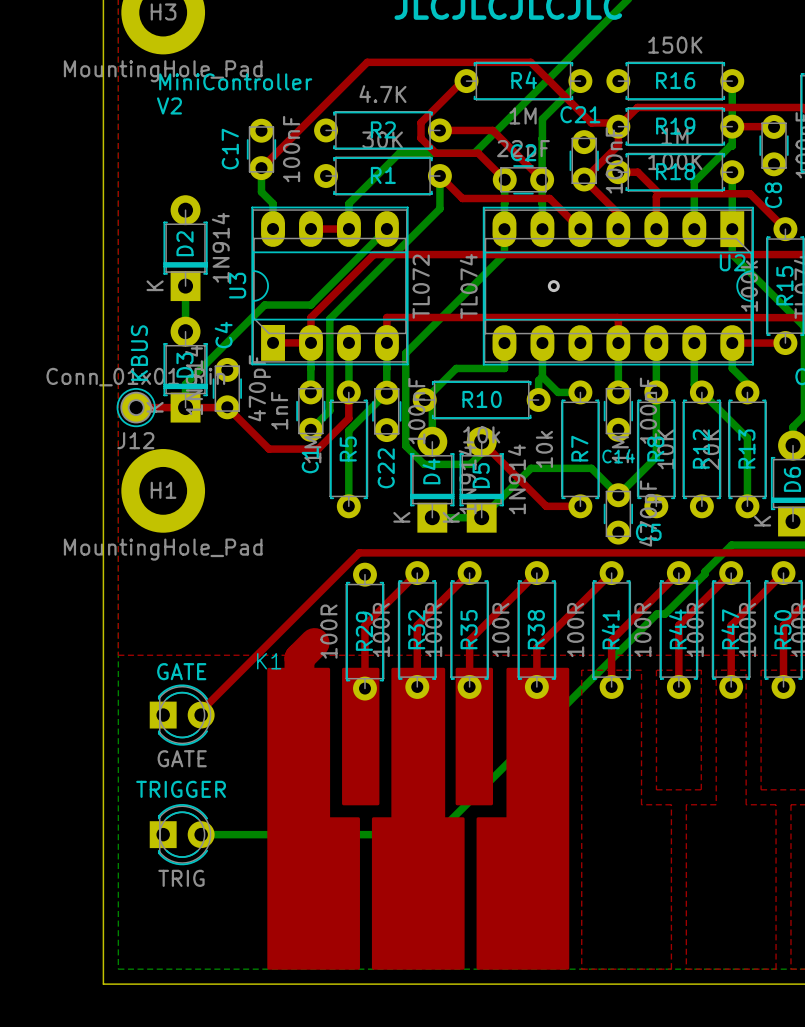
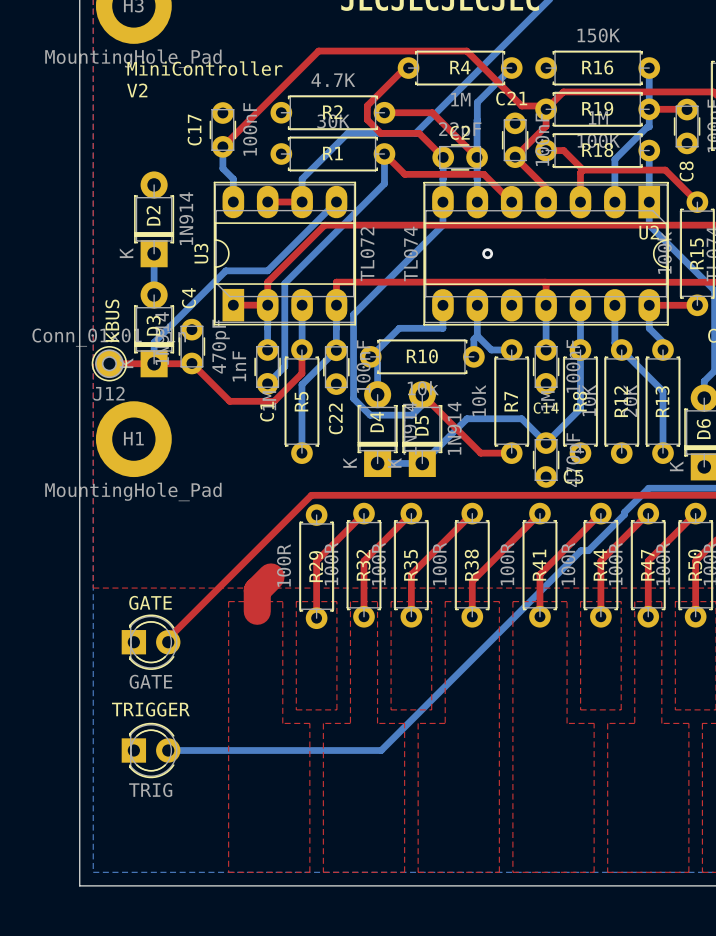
top zone outline: none -> (228, 601) (282, 601) (282, 723) (309, 723) (309, 872) (228, 872) (228, 601)
top zone outline: none -> (296, 601) (336, 601) (336, 709) (296, 709) (296, 601)
top zone outline: none -> (350, 601) (377, 601) (377, 723) (404, 723) (404, 872) (323, 872) (323, 723) (350, 723) (350, 601)
top zone outline: none -> (391, 601) (431, 601) (431, 709) (391, 709) (391, 601)
top zone outline: none -> (445, 601) (445, 723) (418, 723) (418, 872) (499, 872) (499, 601) (445, 601)
K1: (418, 818) -> none

